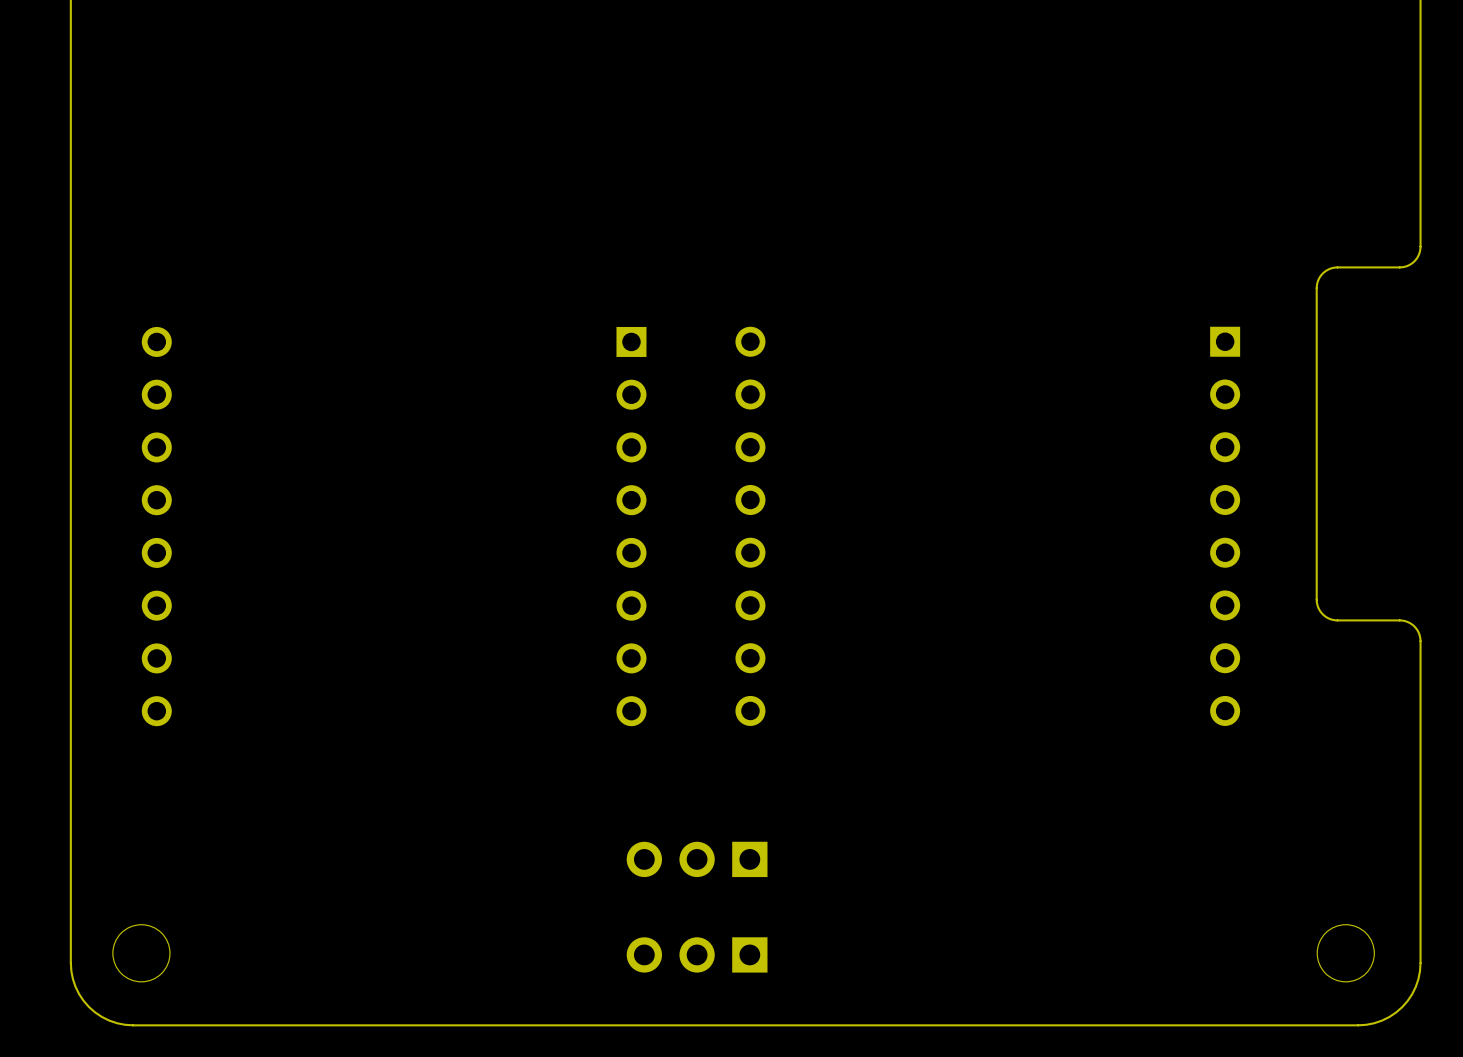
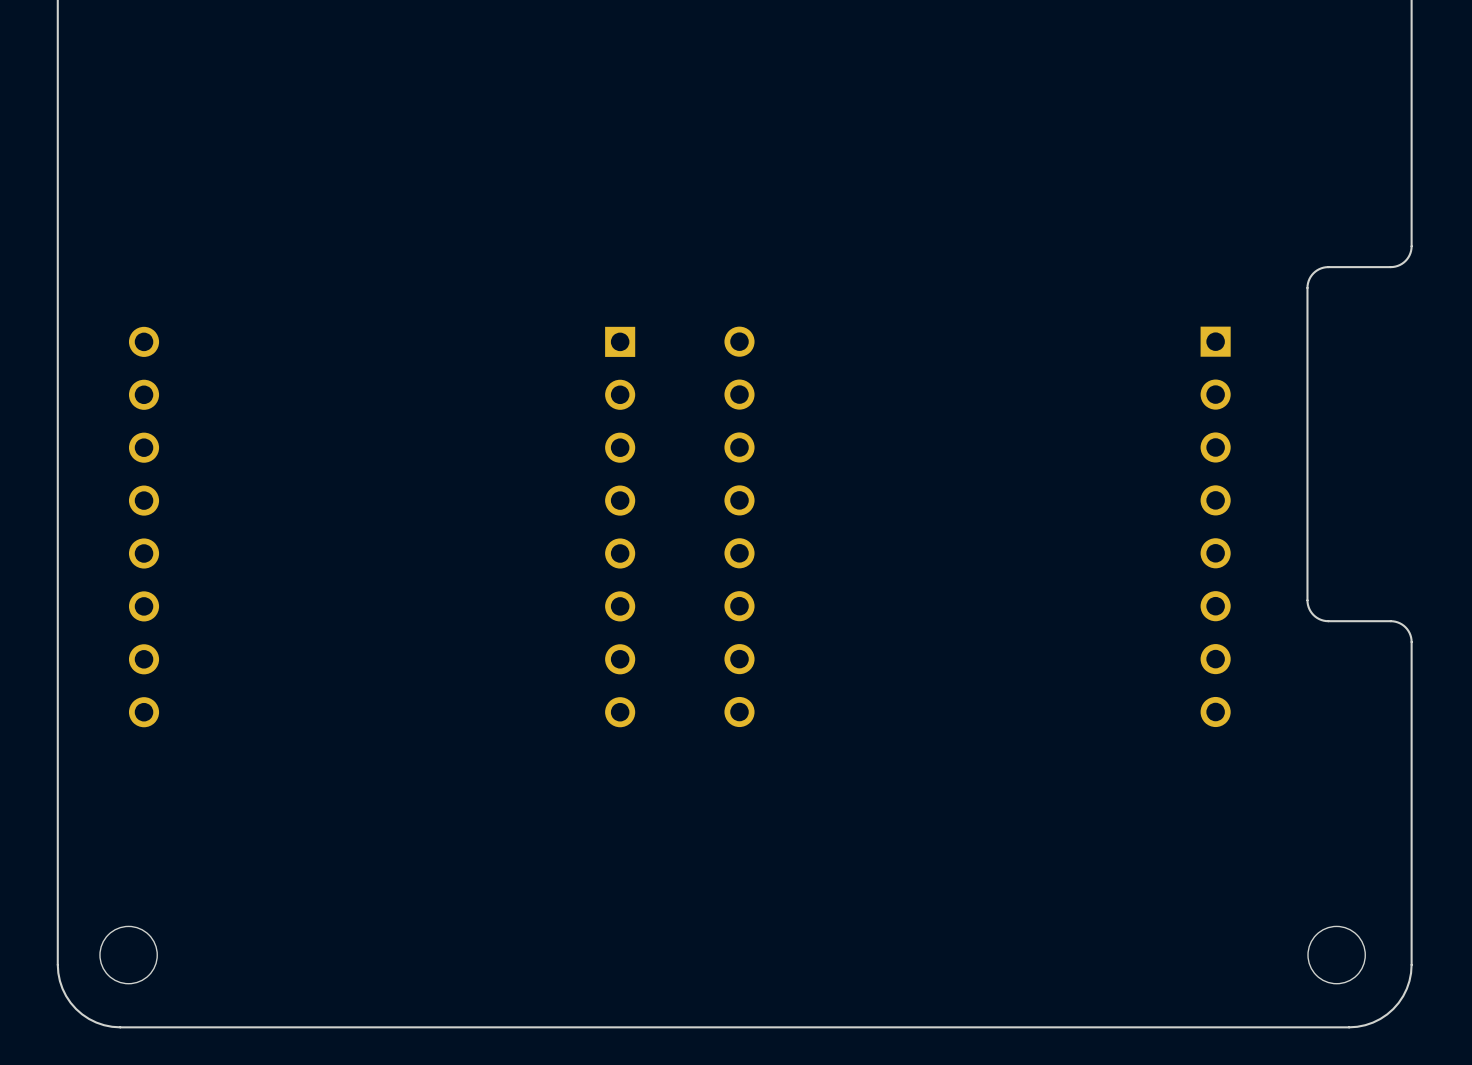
part: (697, 859) -> none
part: (697, 954) -> none

